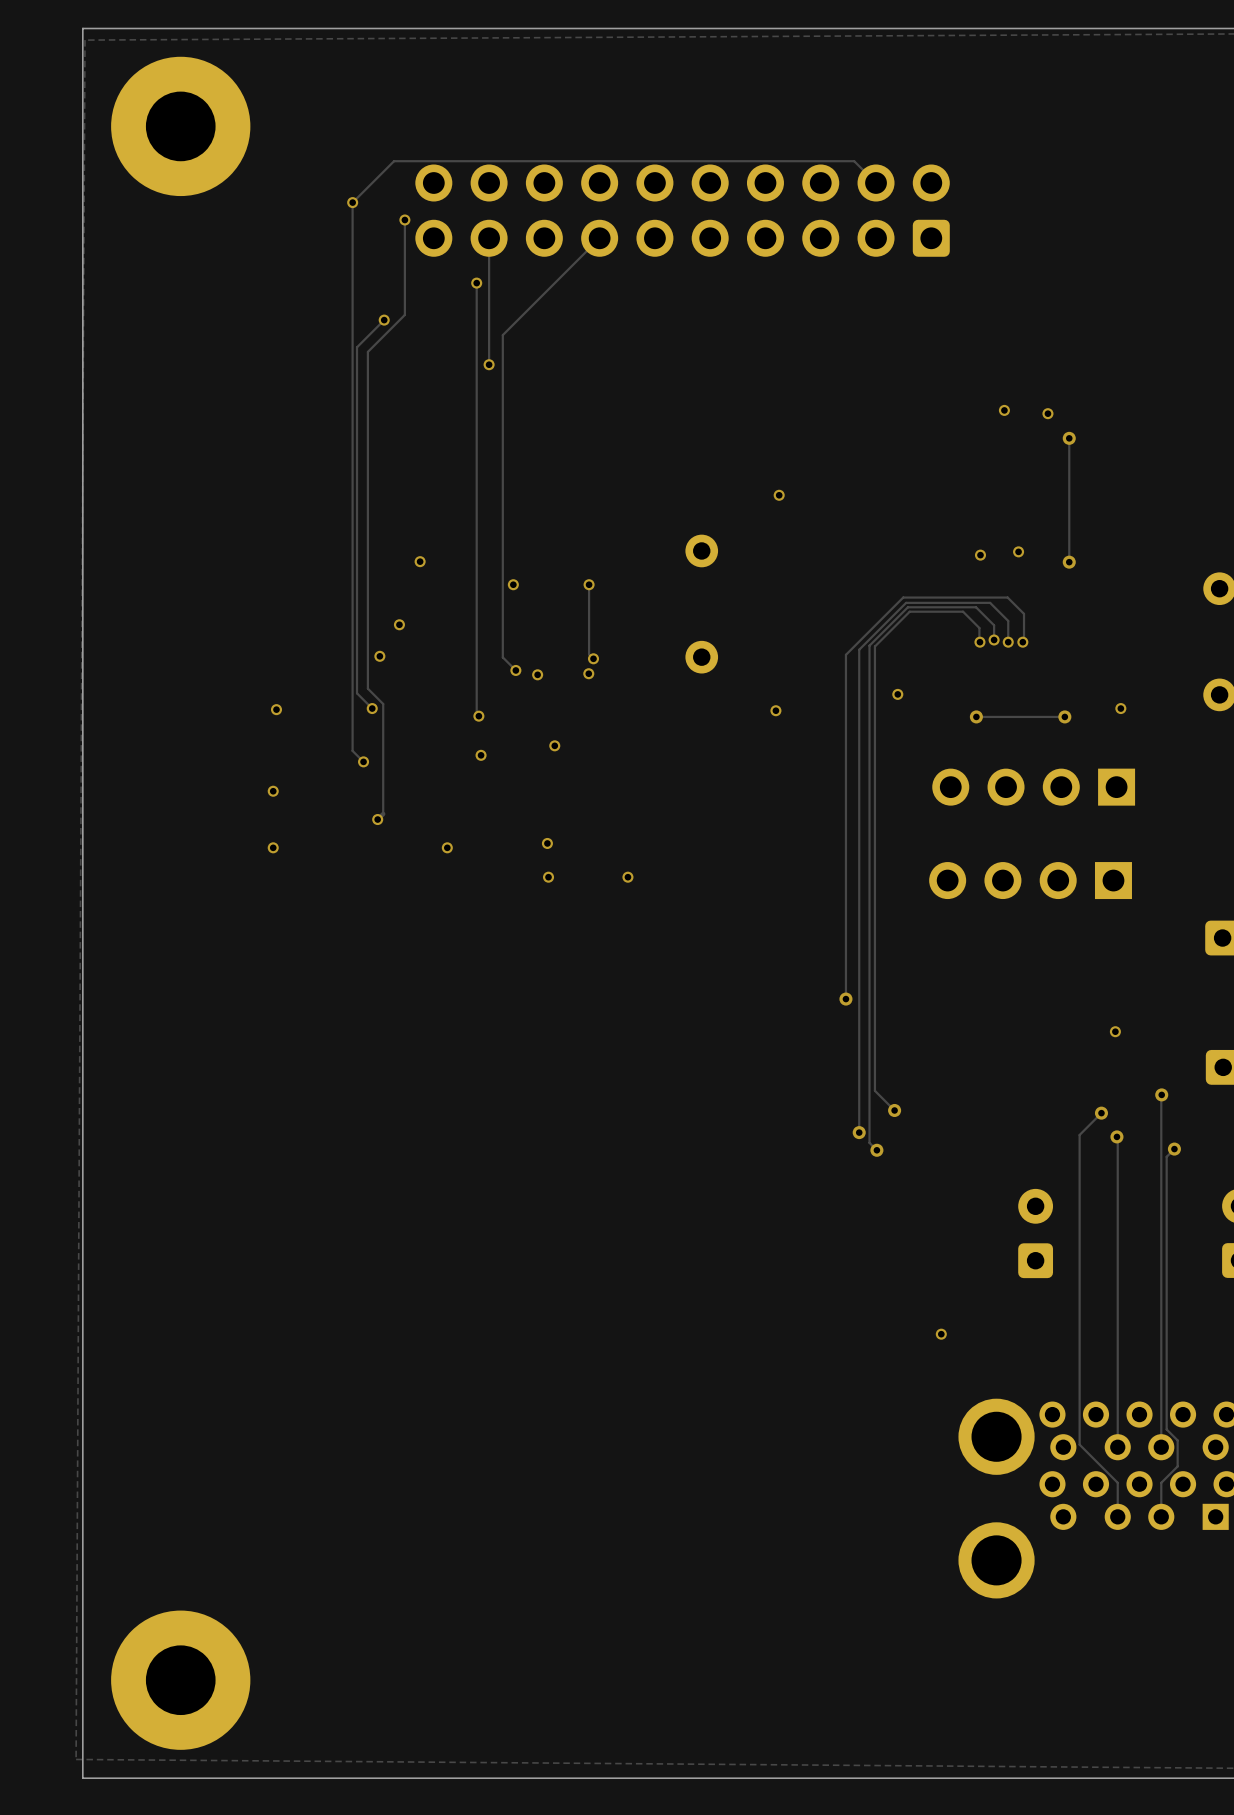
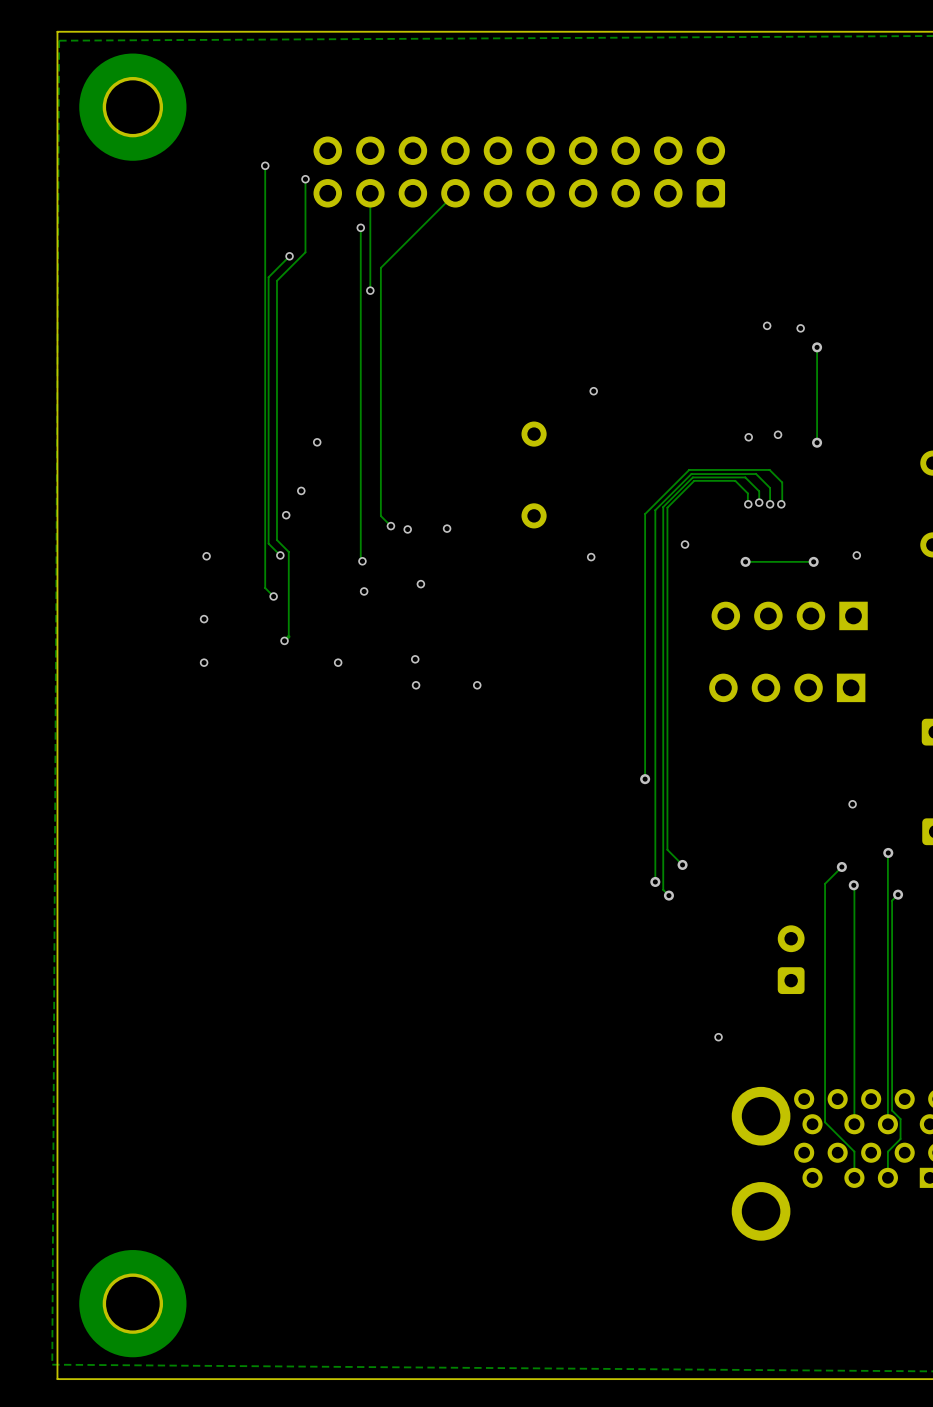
track: (876, 183) (854, 161) (394, 161) (352, 202) -> none
via: (513, 584) -> none
track: (589, 584) (589, 654) (593, 658) -> none
via: (589, 584) -> none
via: (593, 658) -> none

